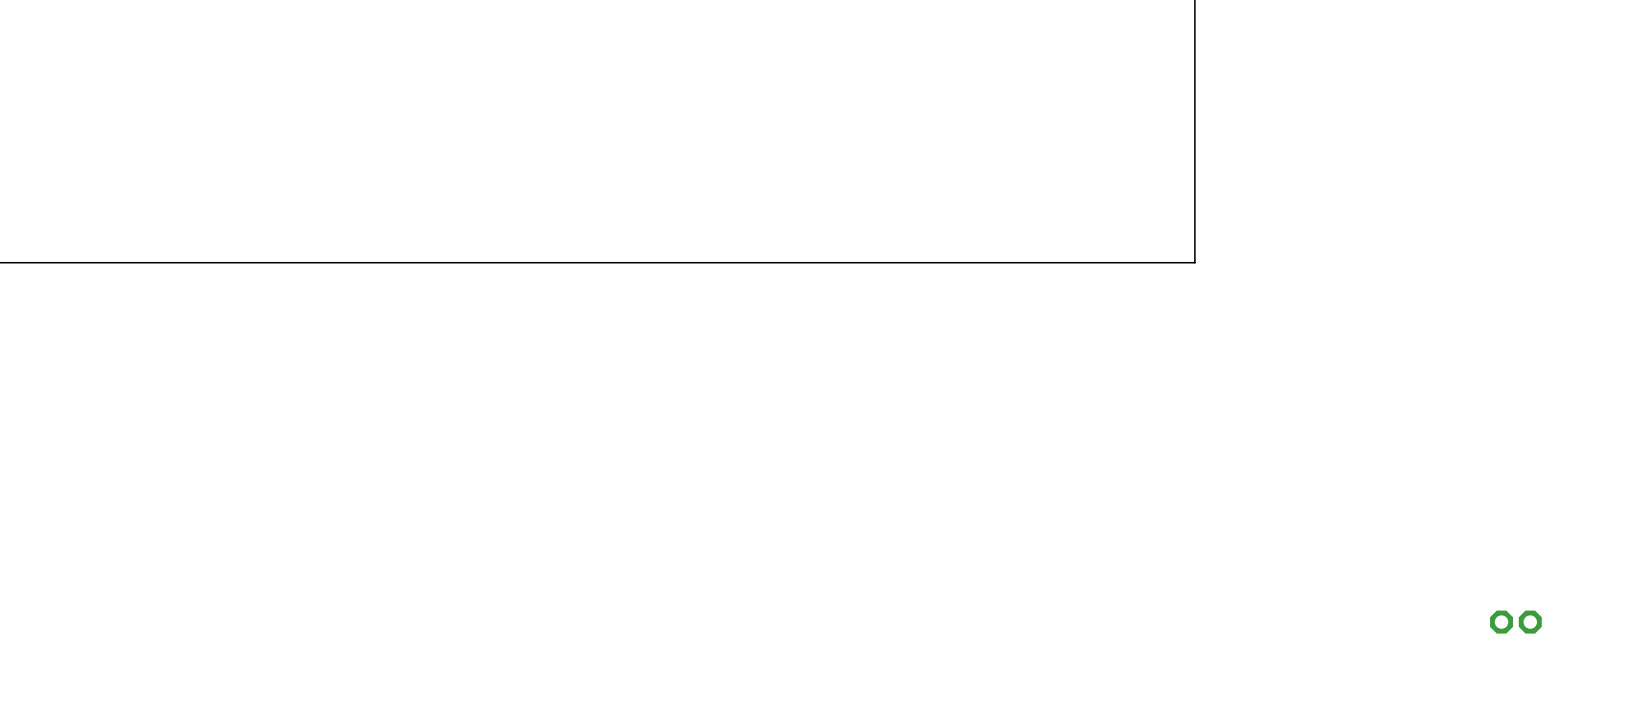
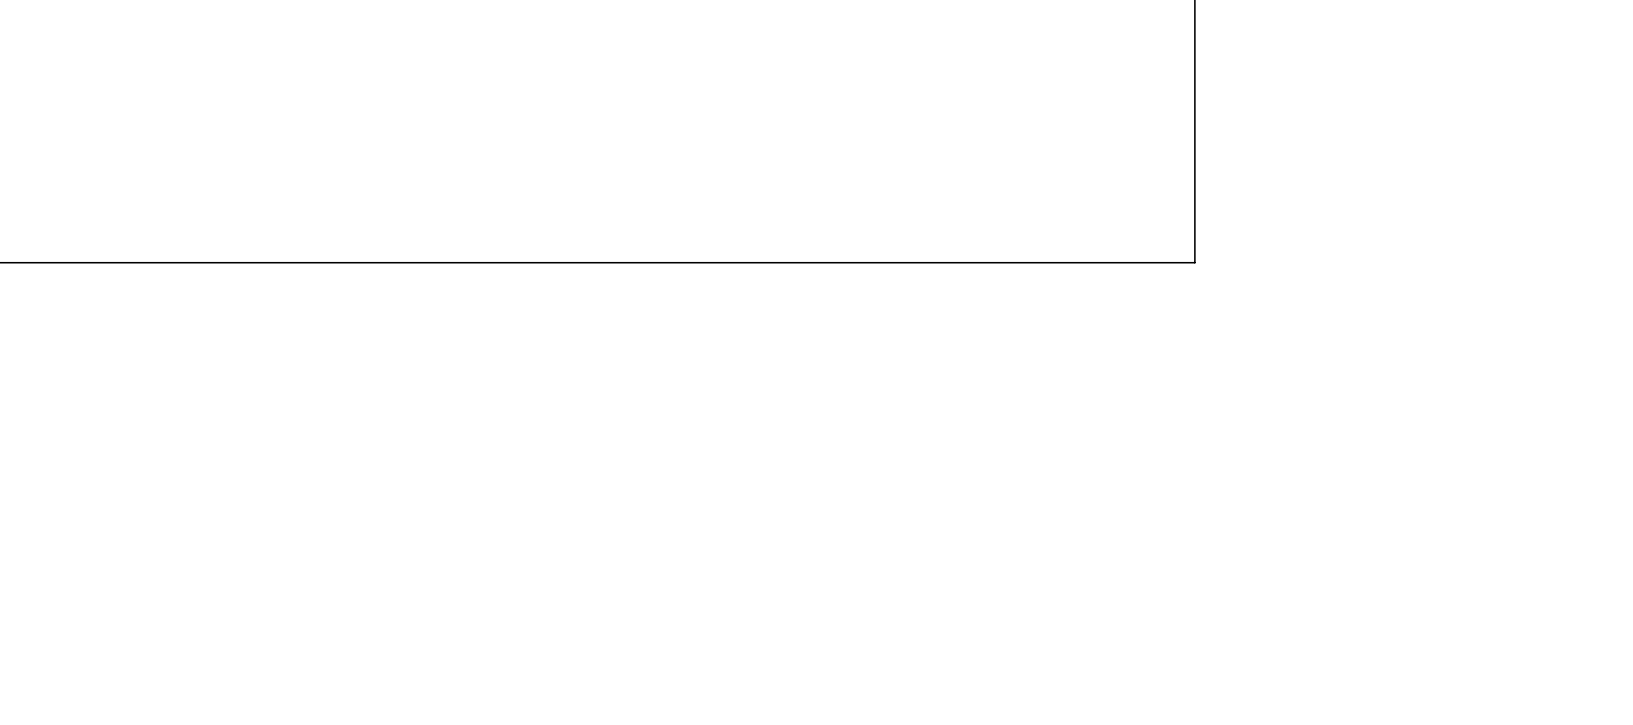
part: (1515, 622) -> none

